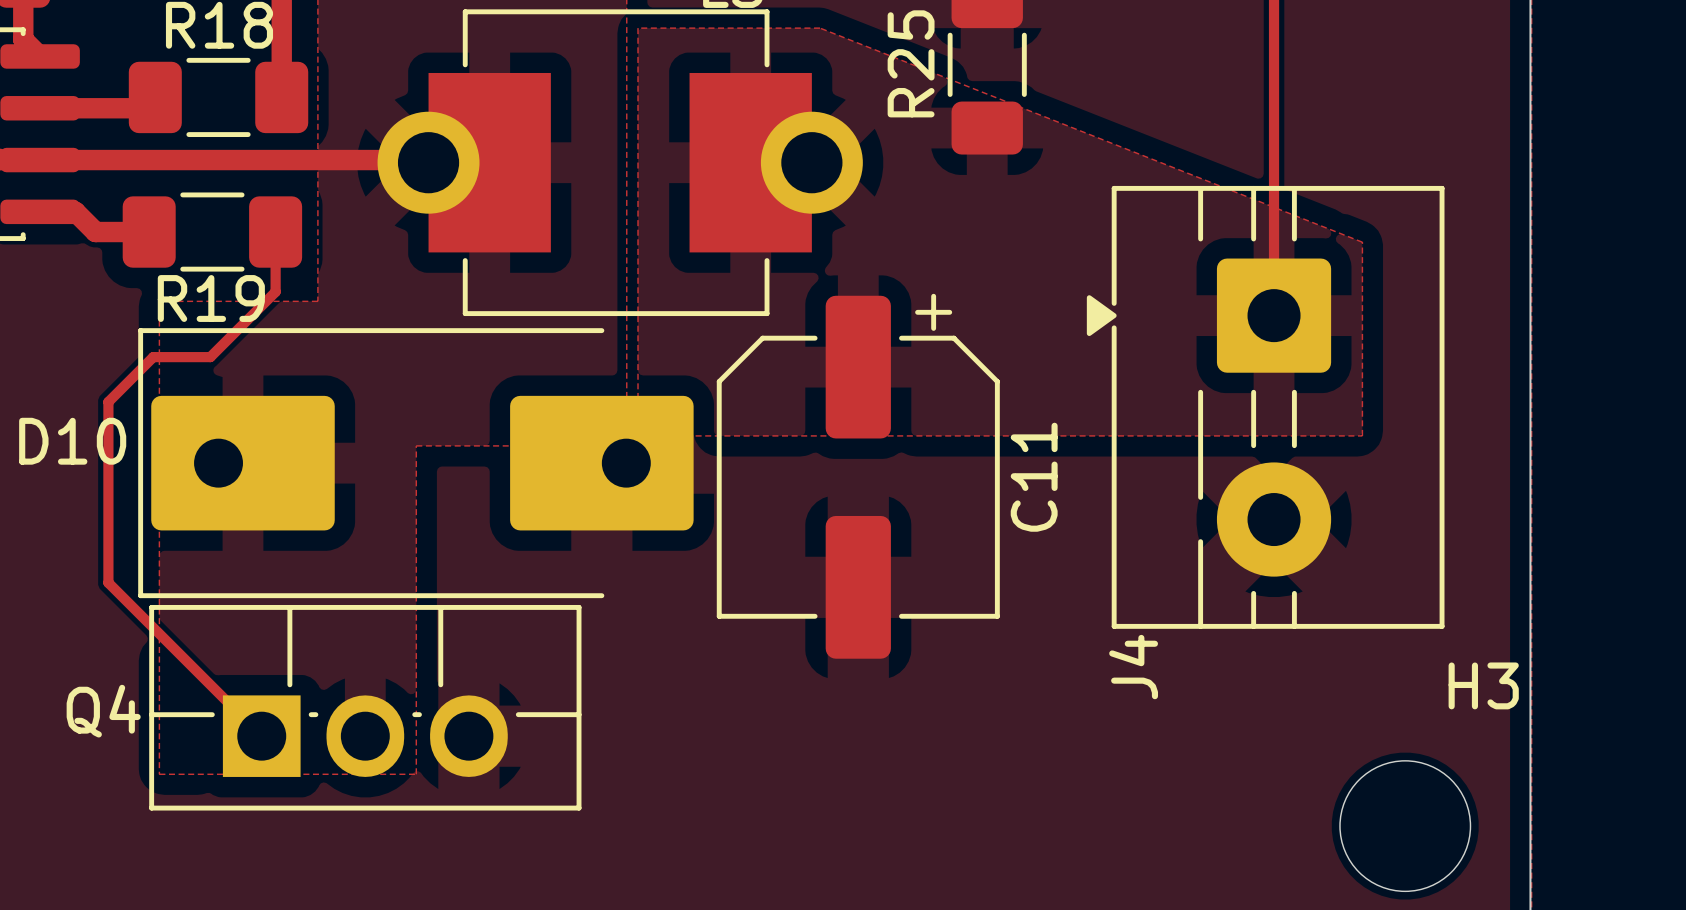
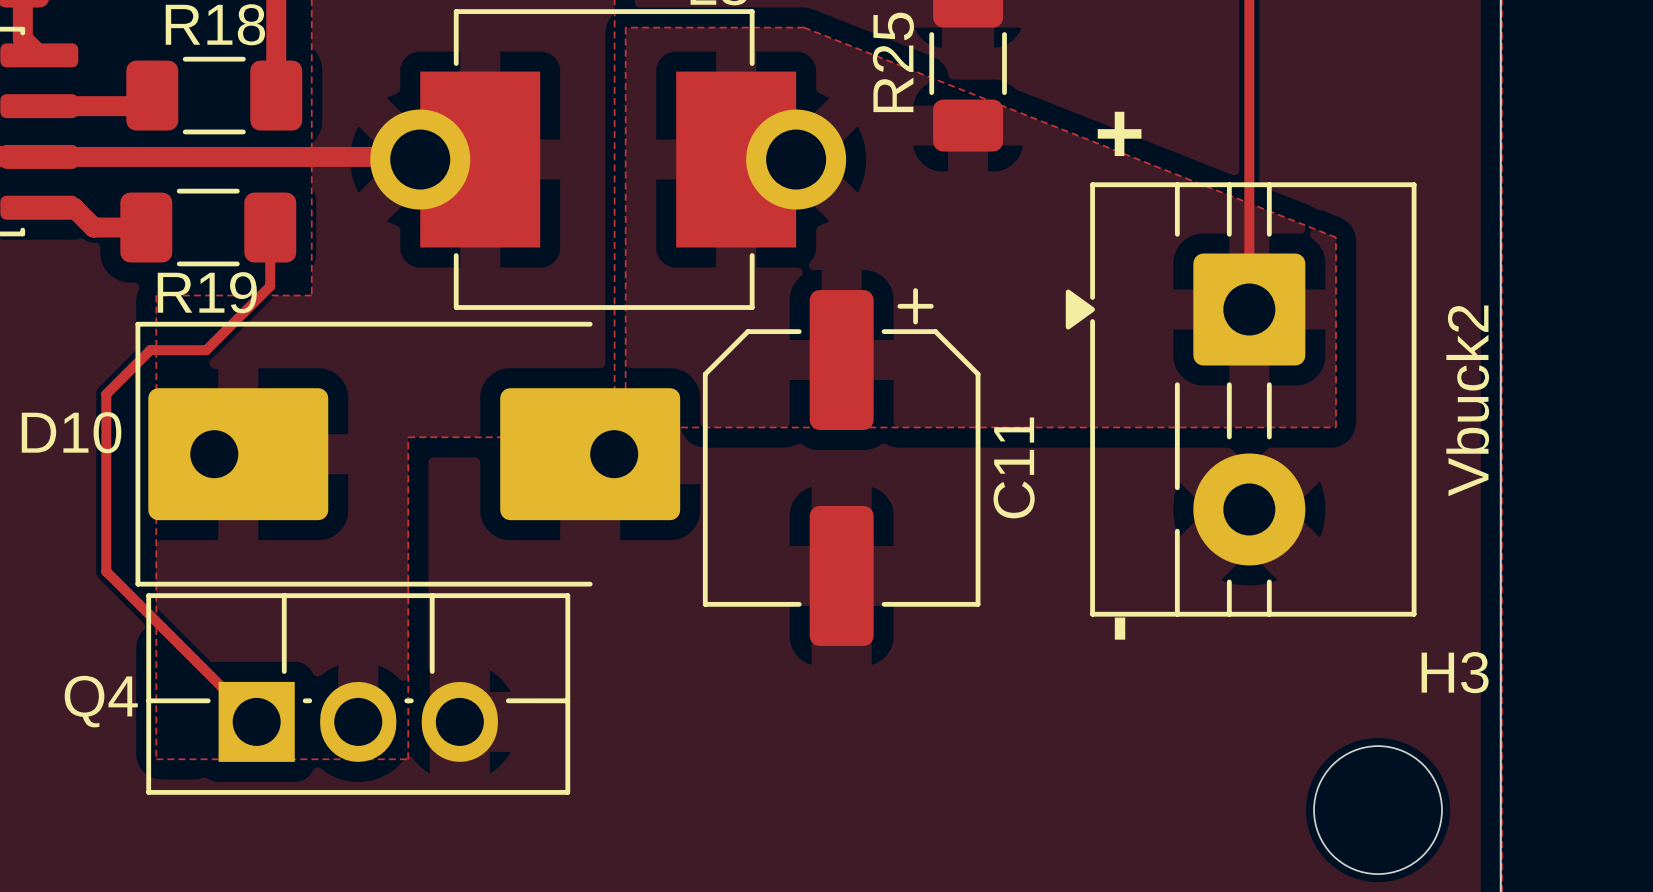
text: none -> + (1119, 133)
J4 name: J4 (1133, 667) -> Vbuck2 (1467, 400)
text: none -> - (1120, 628)

